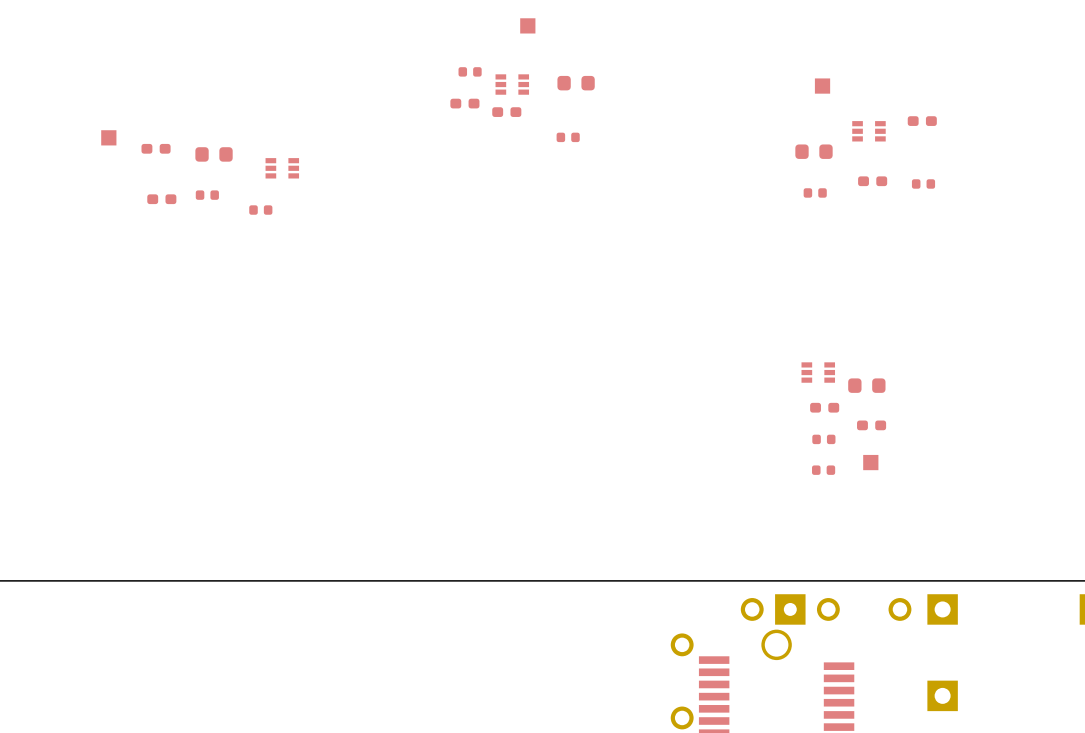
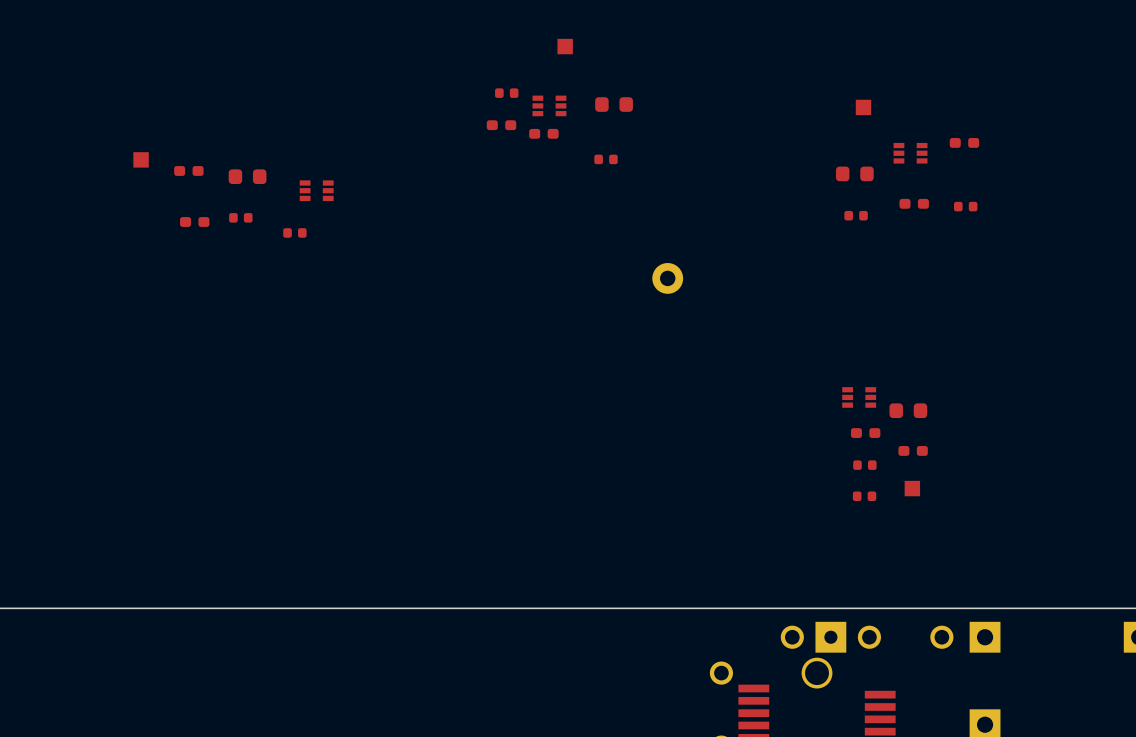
part: none -> (667, 278)

